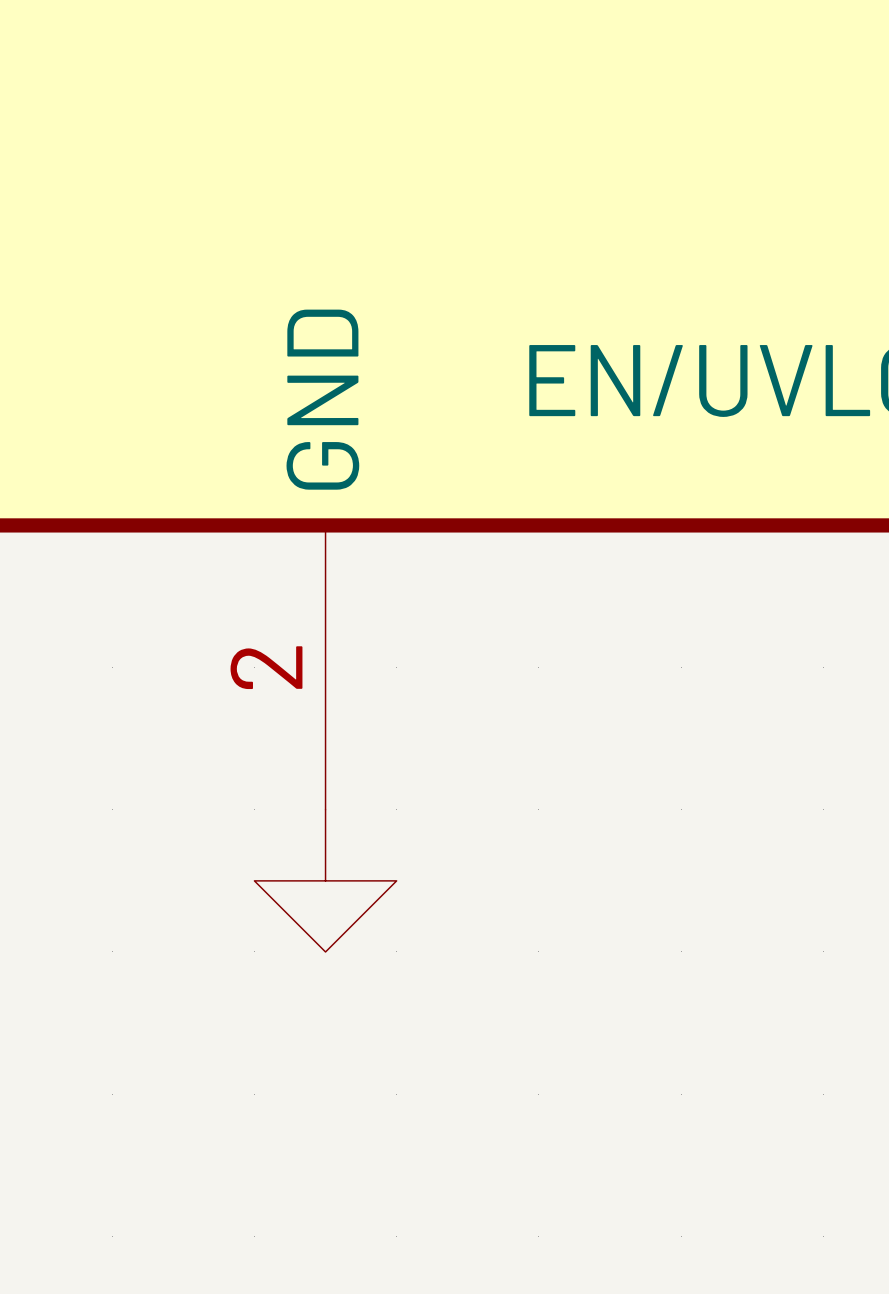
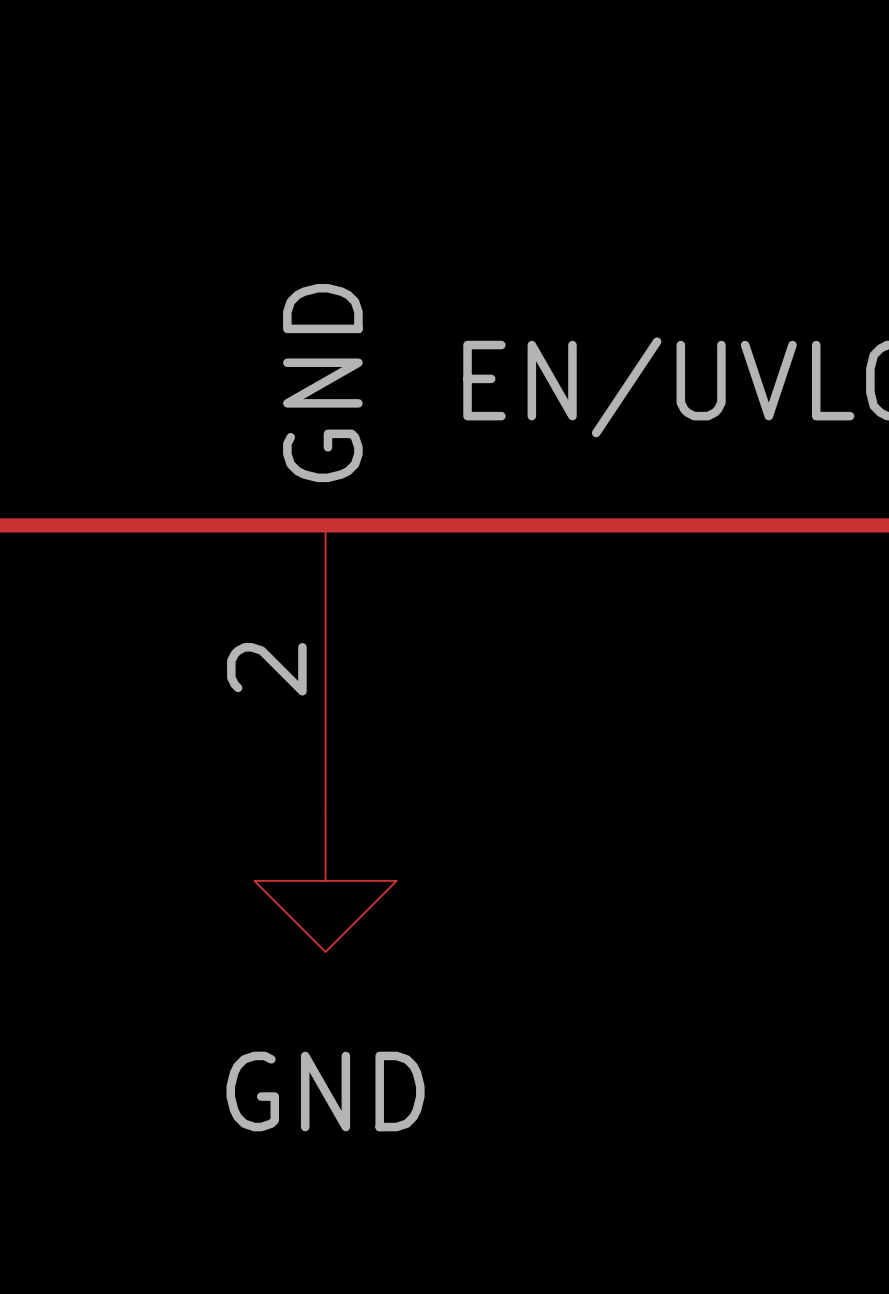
power symbol text: none -> GND (325, 1091)

